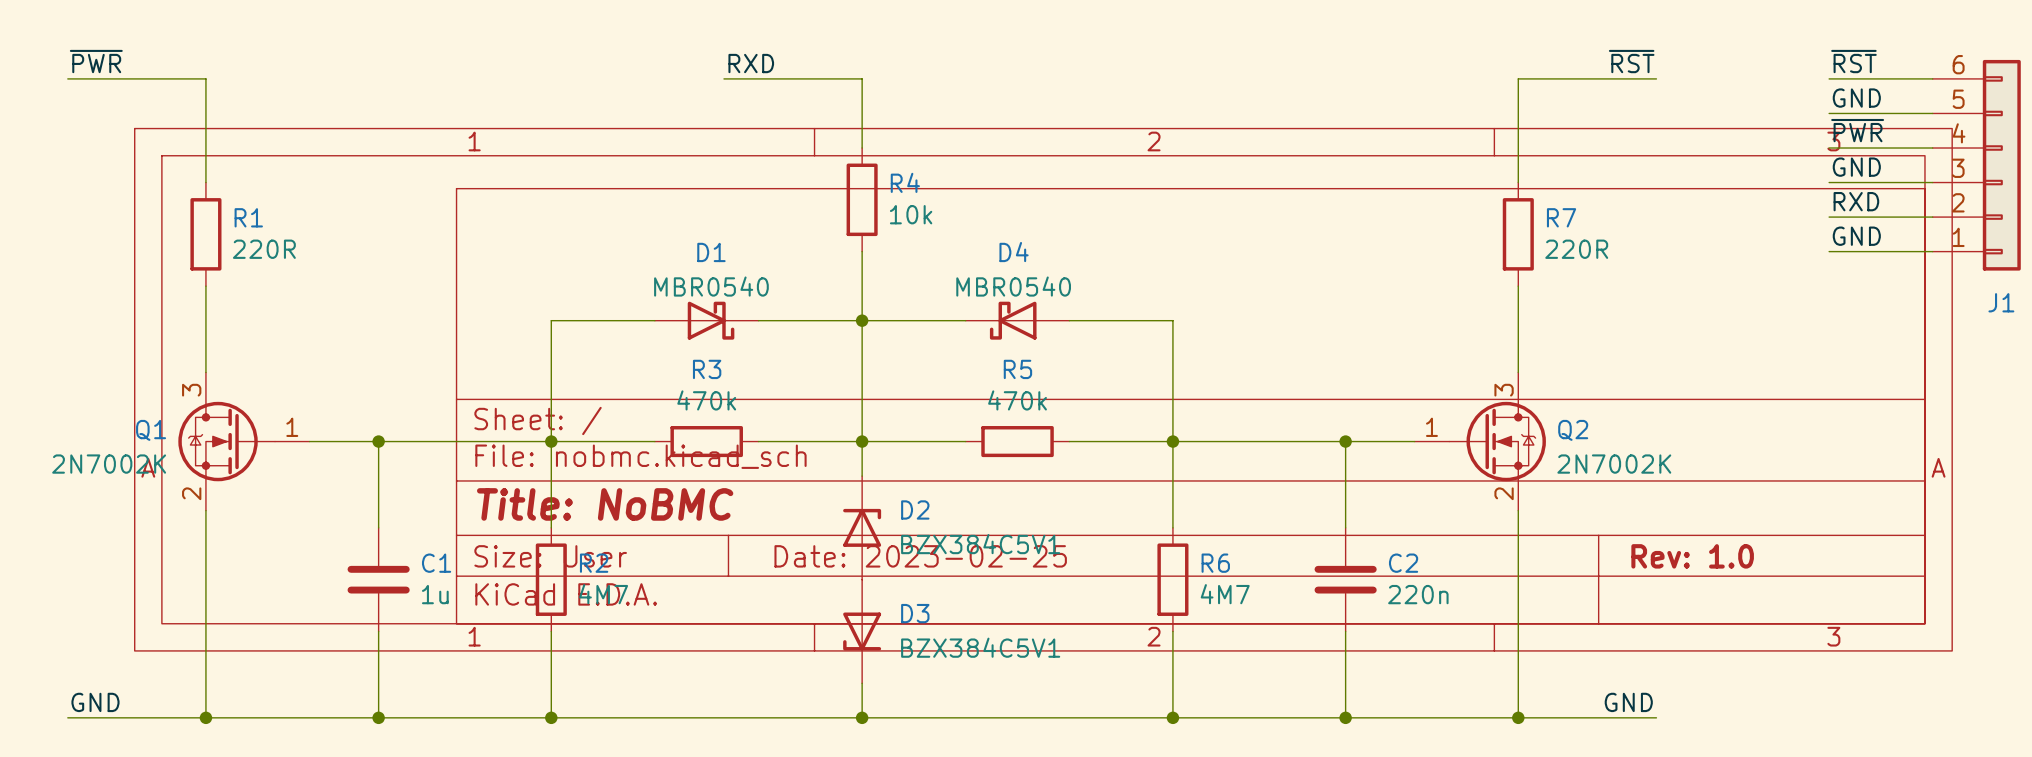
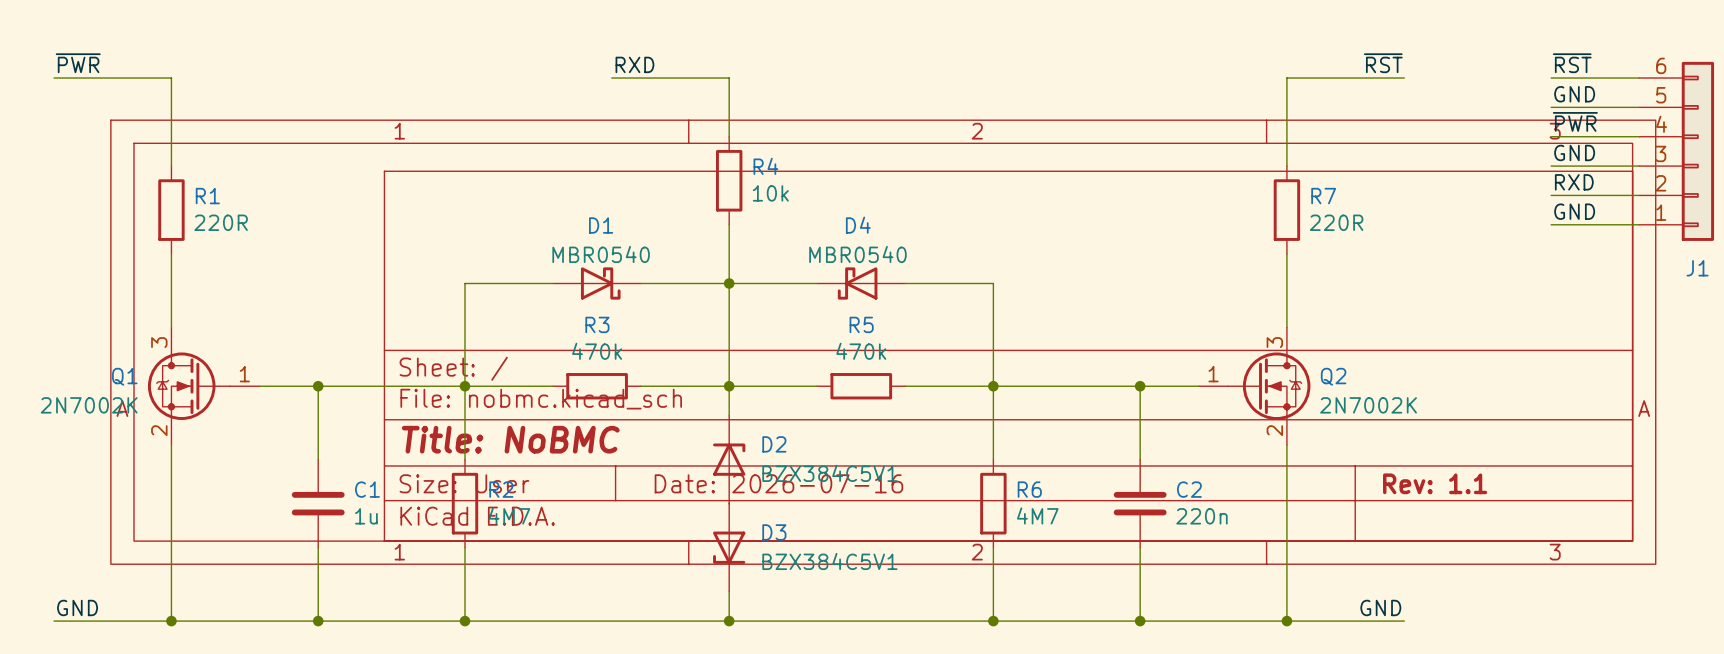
title block: Date: 2023-02-25 (920, 556) -> Date: 2026-07-16 (778, 483)
title block: Rev: 1.0 (1692, 556) -> Rev: 1.1 (1435, 483)

